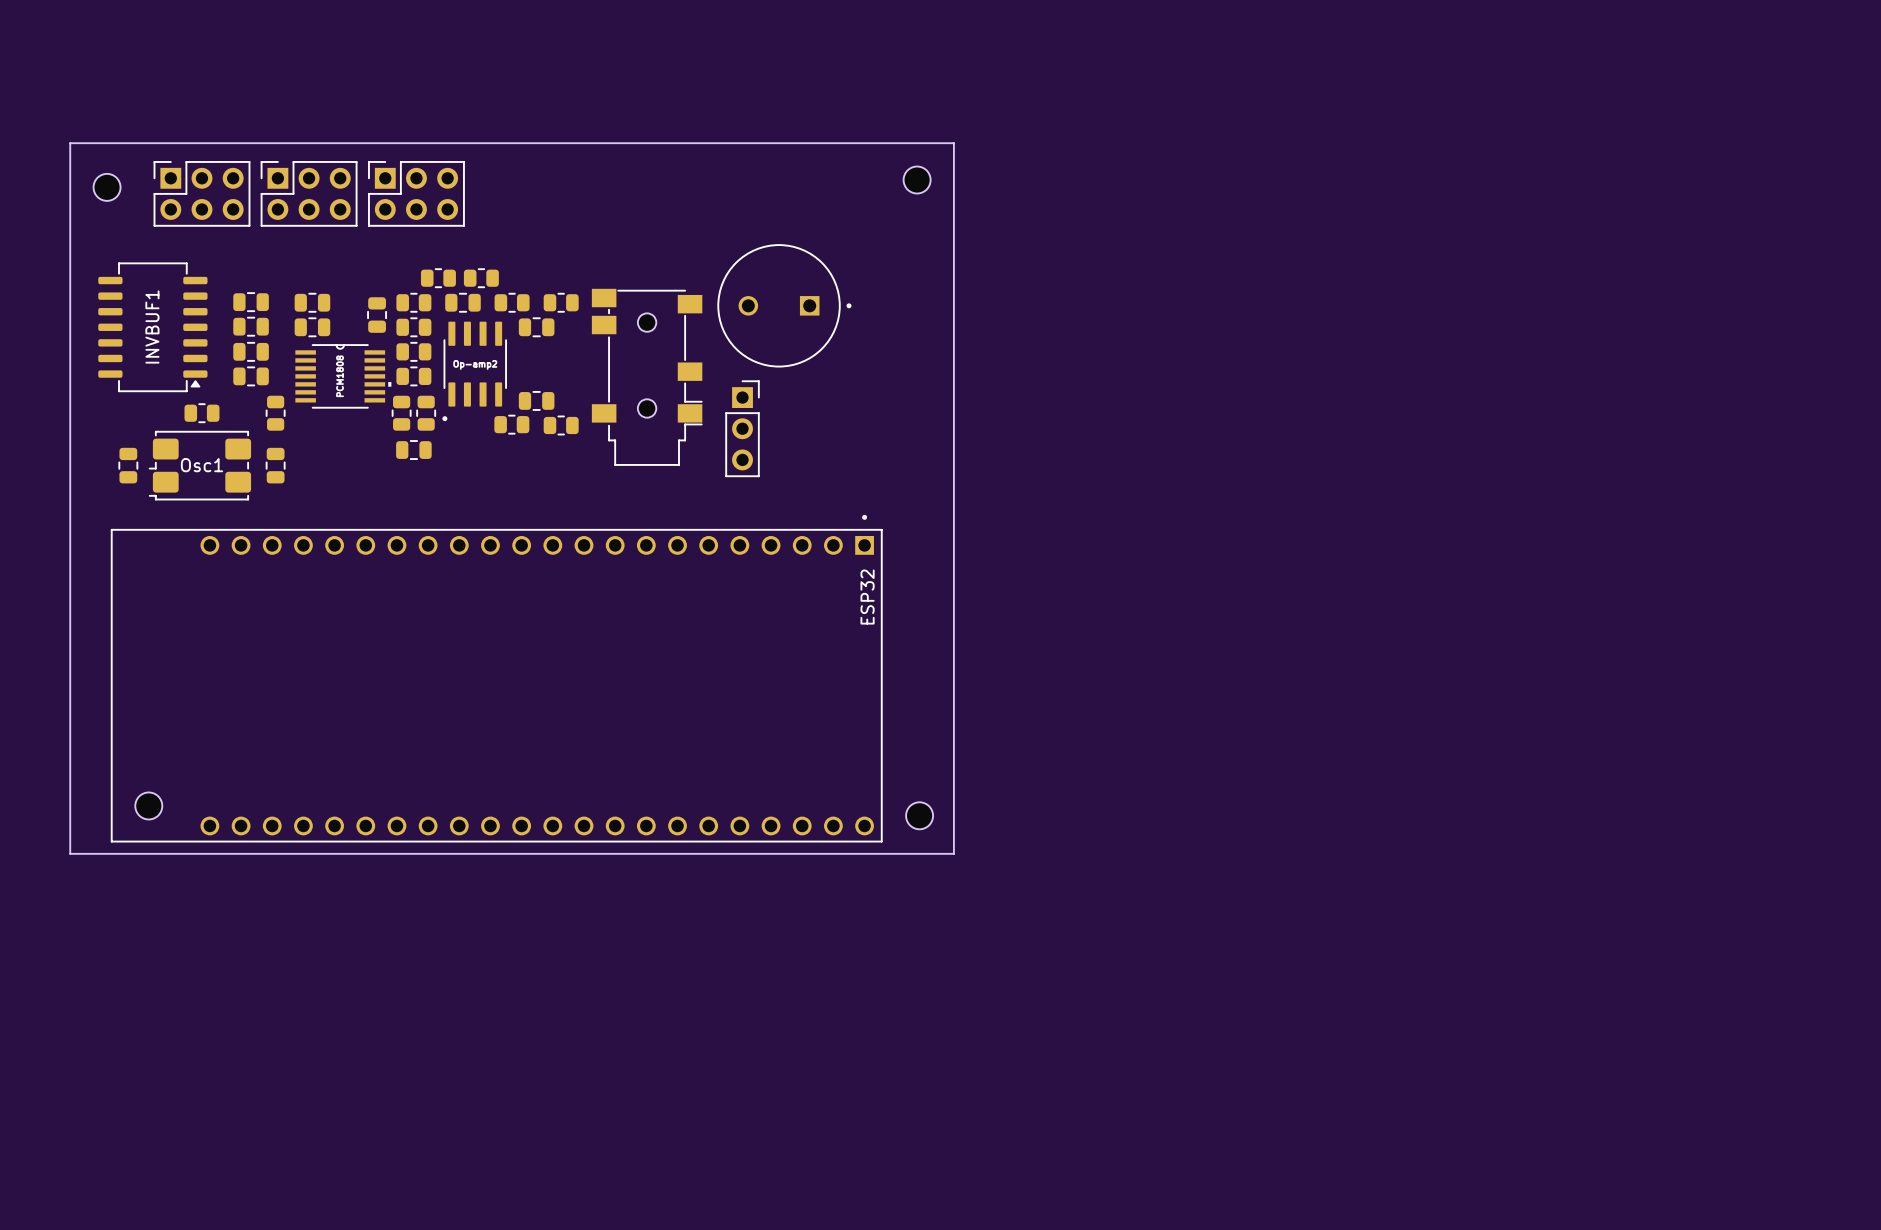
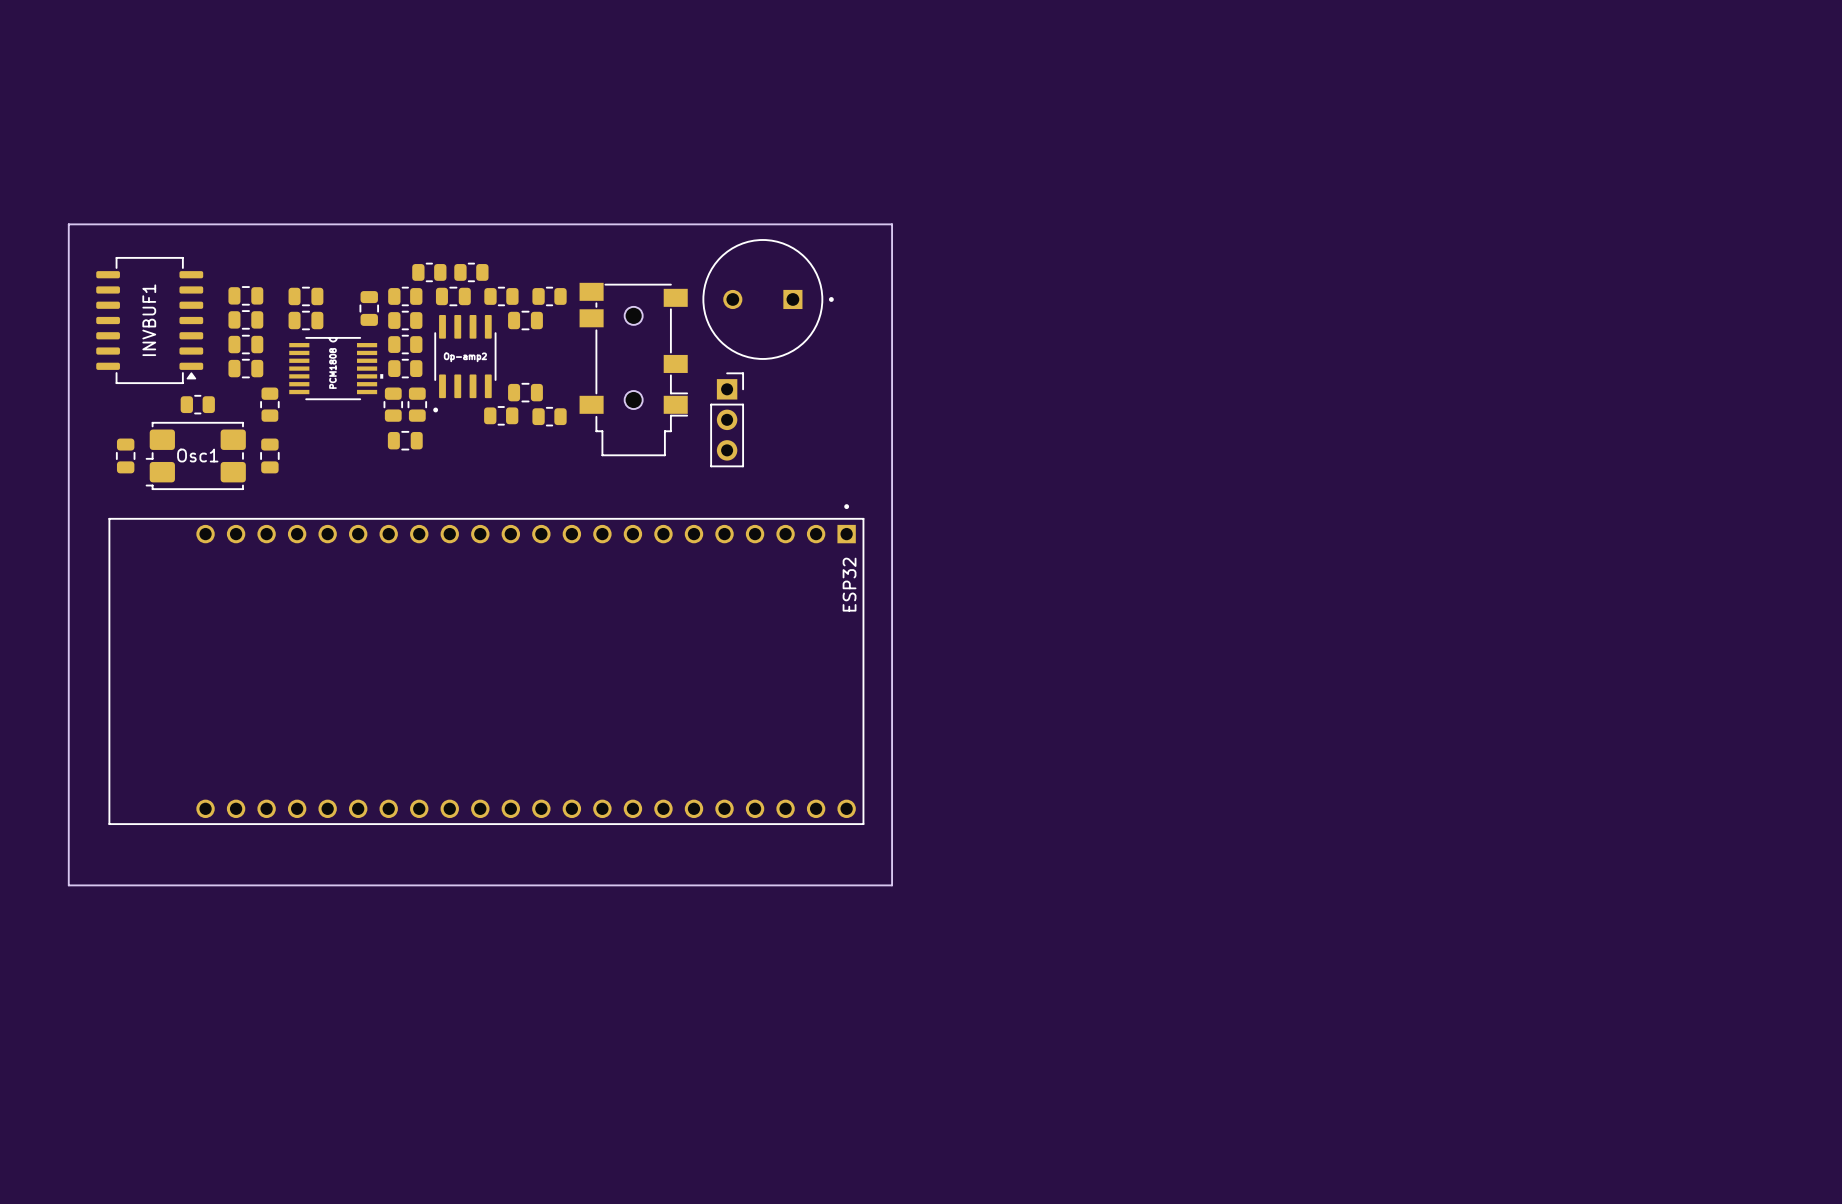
part: (917, 180) -> none
part: (107, 187) -> none
part: (201, 193) -> none
part: (309, 193) -> none
part: (416, 193) -> none
board edge: (70, 229) (70, 143) (953, 143) (953, 853) (70, 853) -> (68, 224) (892, 224) (892, 885) (68, 885) (68, 836)
part: (148, 805) -> none
part: (919, 815) -> none

